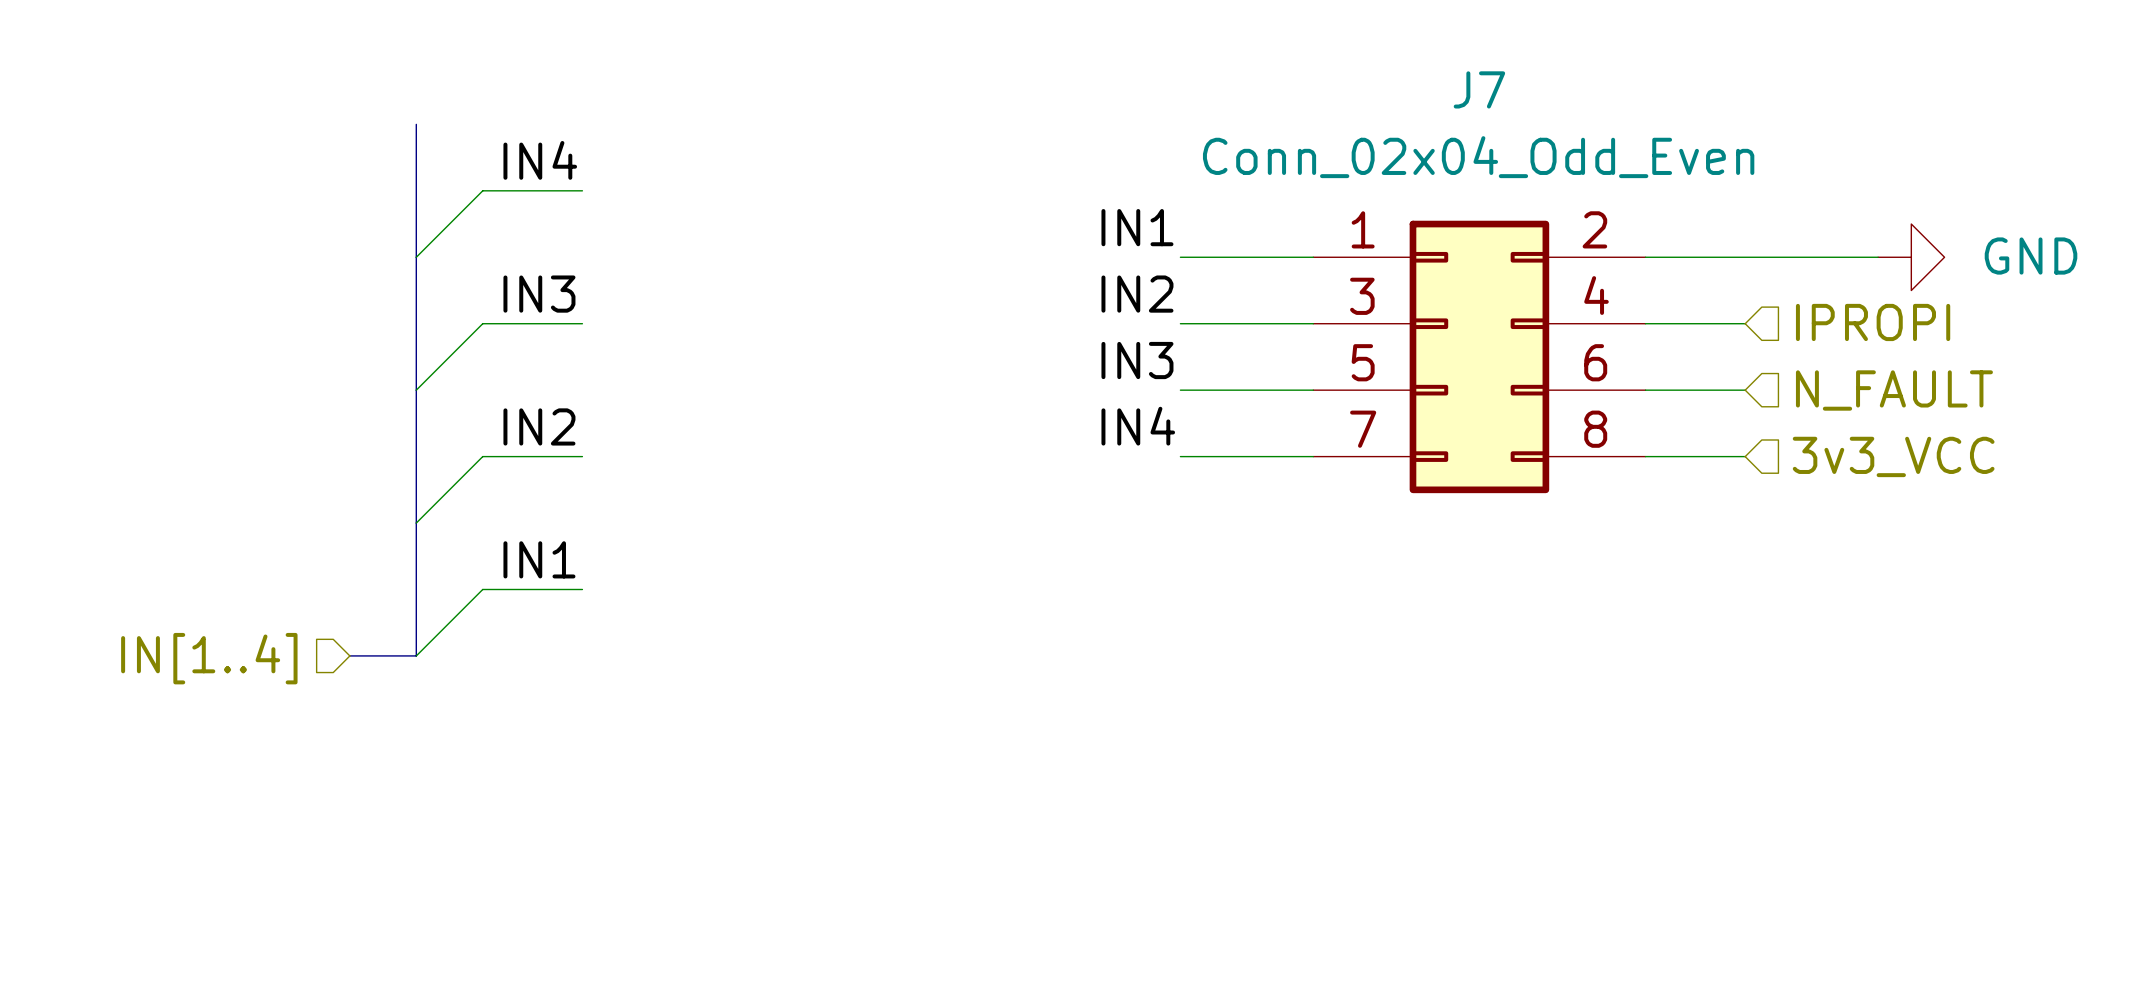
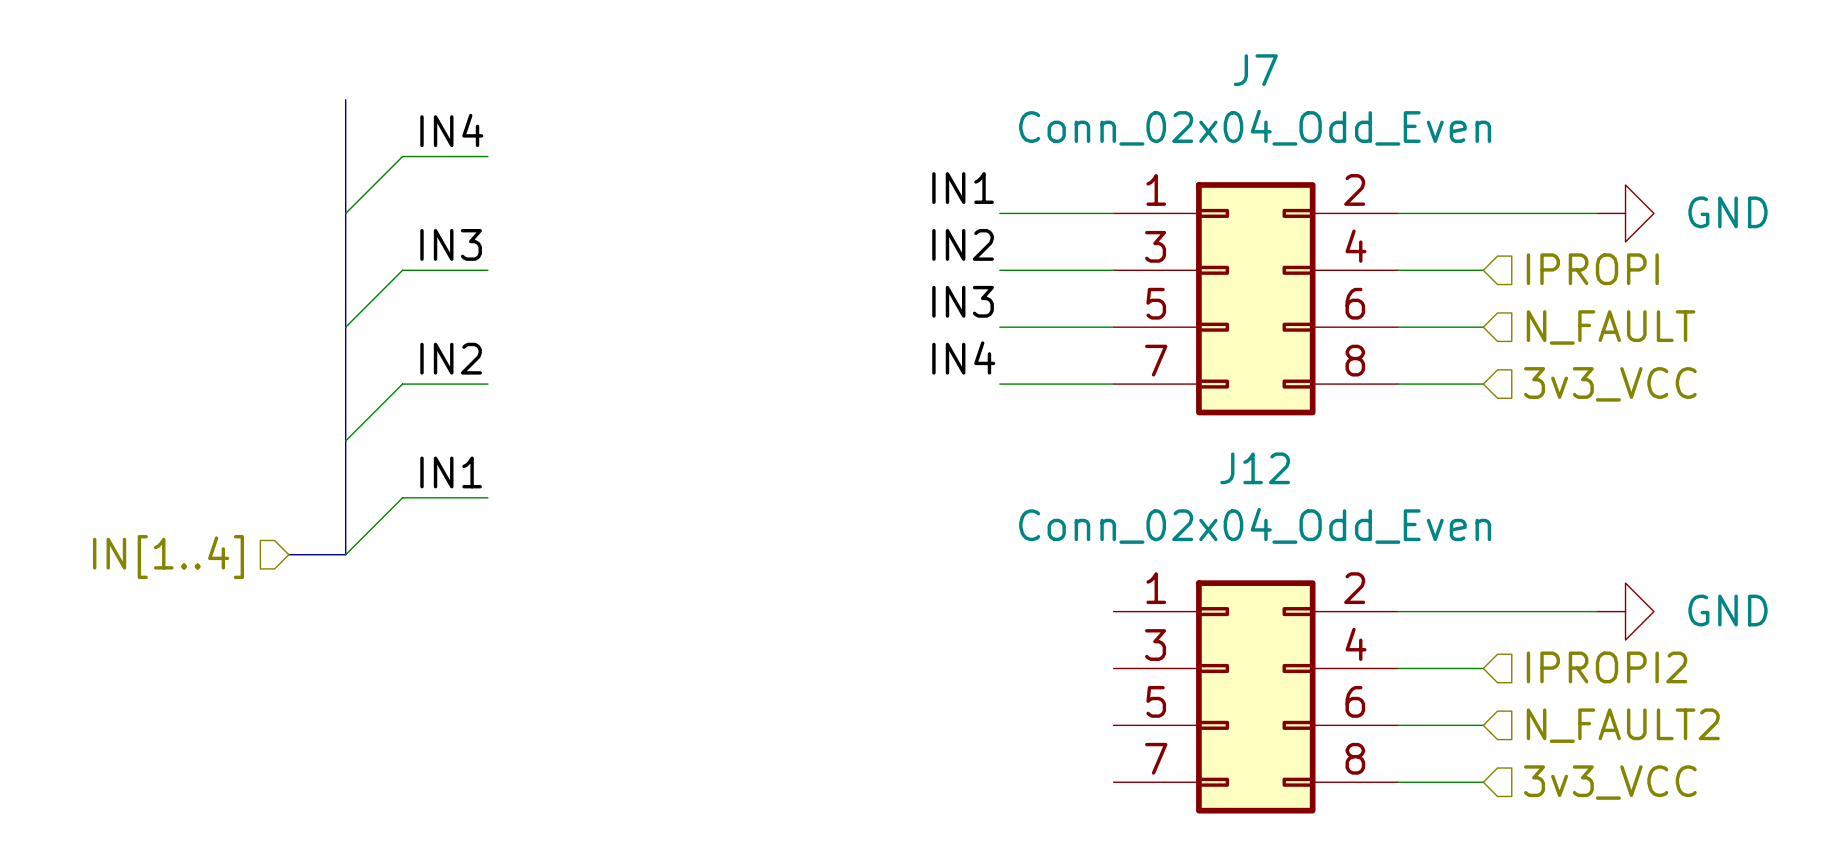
wire: none -> (1397, 611) (1597, 611)
power symbol: none -> GND (1625, 611)
hierarchical label: none -> IPROPI2 (1607, 667)
wire: none -> (1397, 668) (1483, 668)
J12: none -> Conn_02x04_Odd_Even (1255, 696)
wire: none -> (1397, 725) (1483, 725)
hierarchical label: none -> N_FAULT2 (1623, 725)
wire: none -> (1397, 782) (1483, 782)
hierarchical label: none -> 3v3_VCC (1610, 782)

